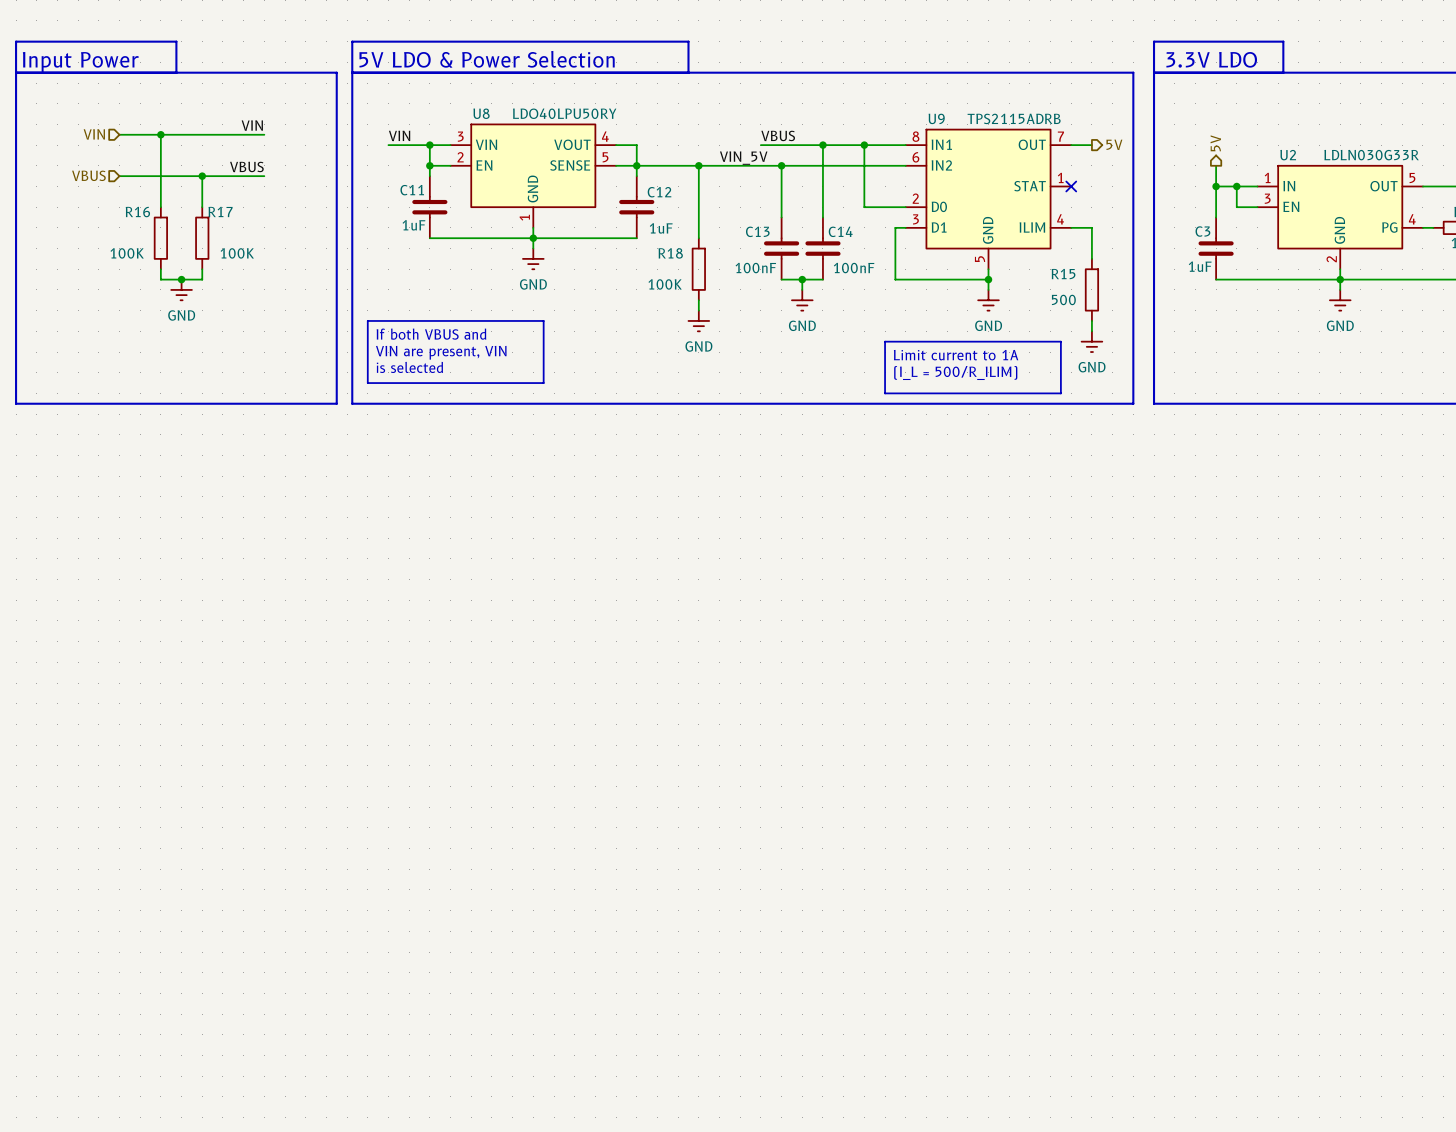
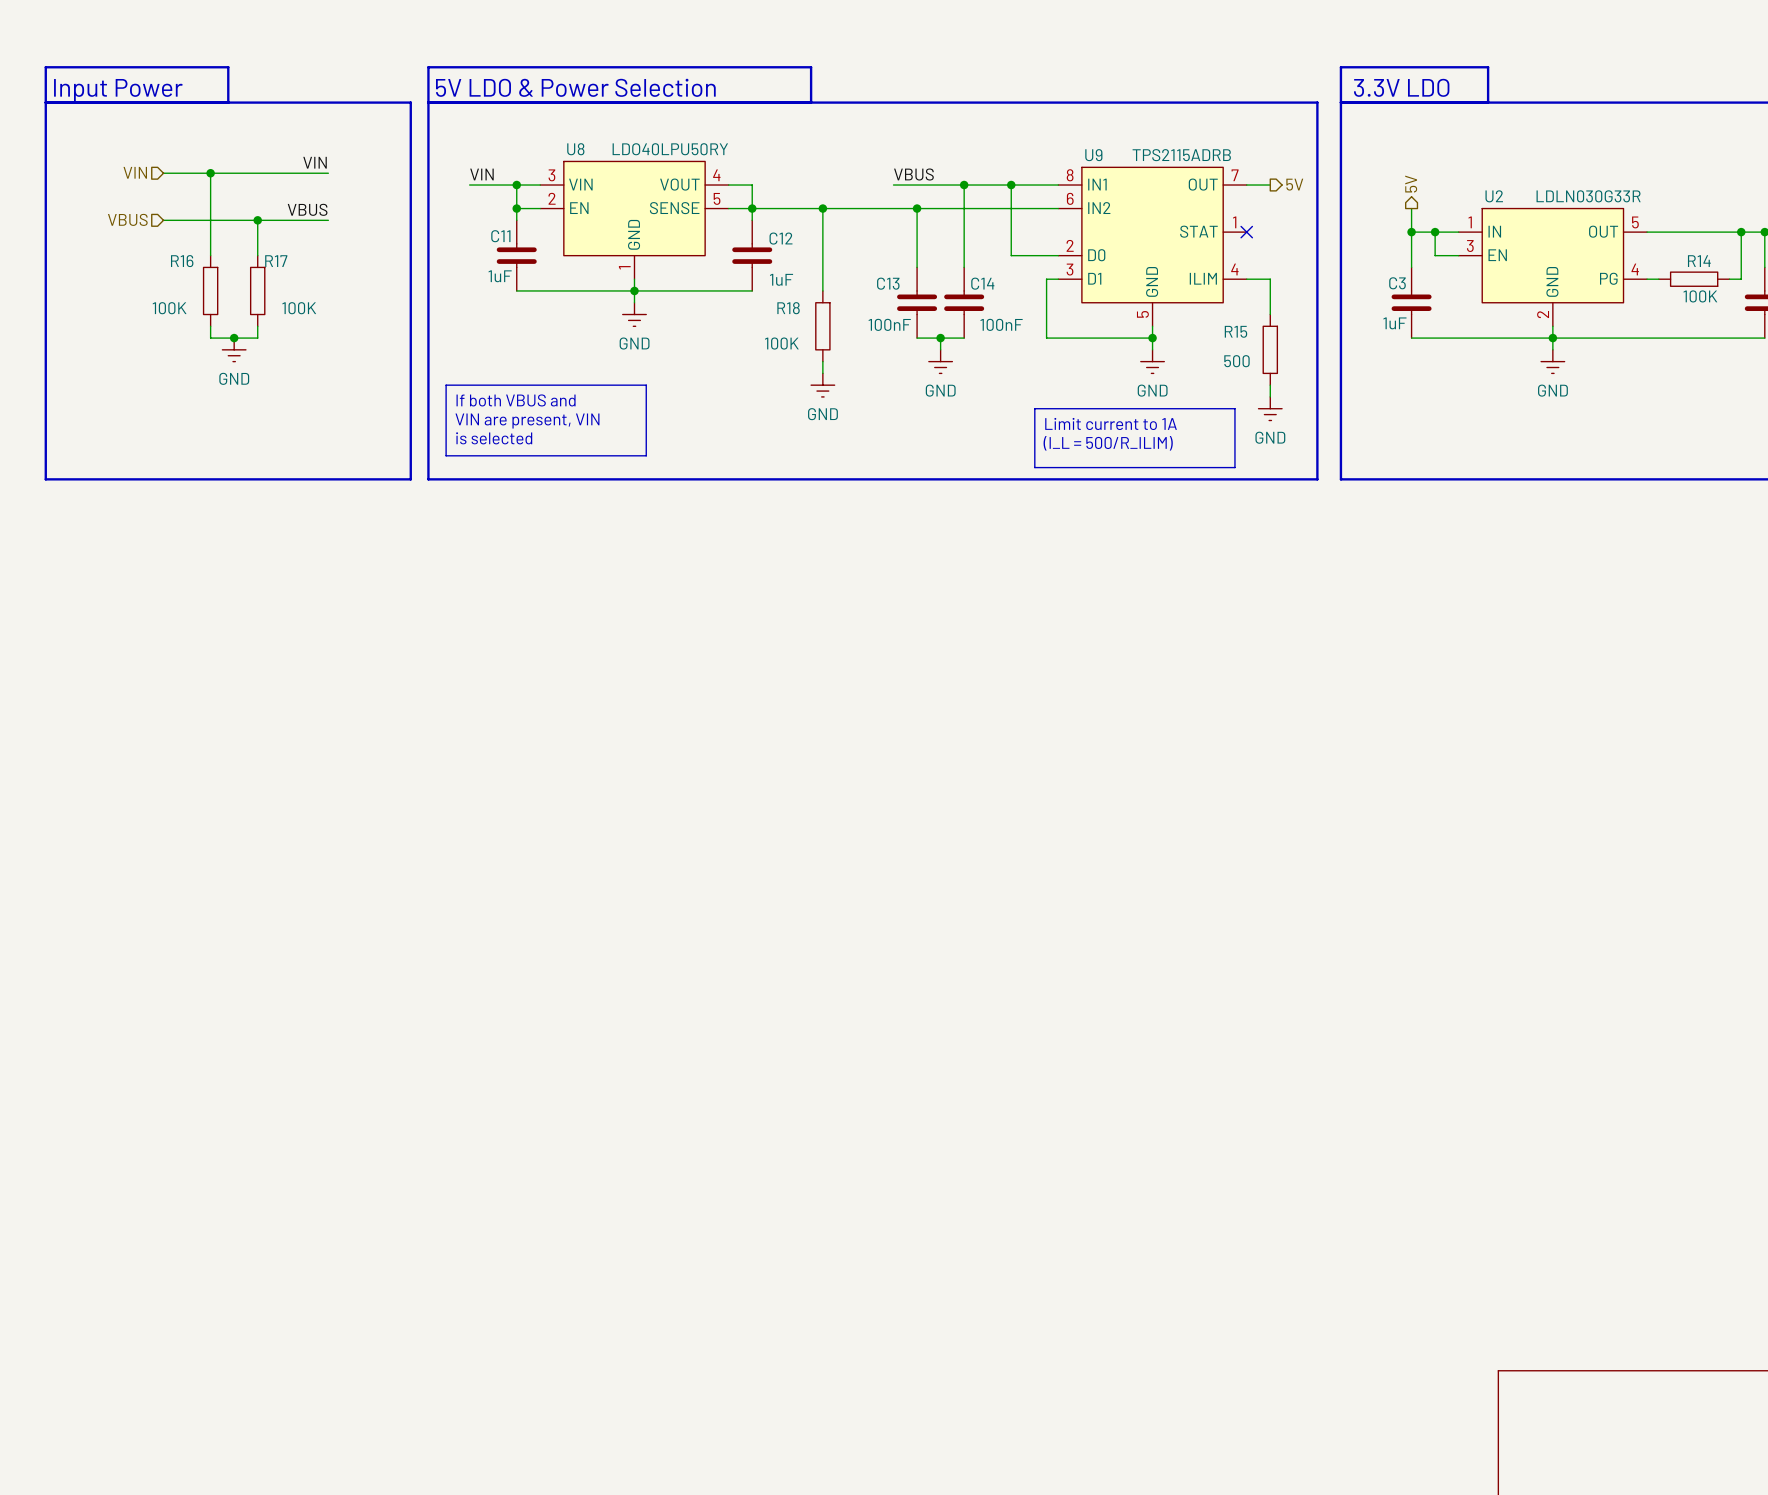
label: VIN_5V (743, 158) -> none

